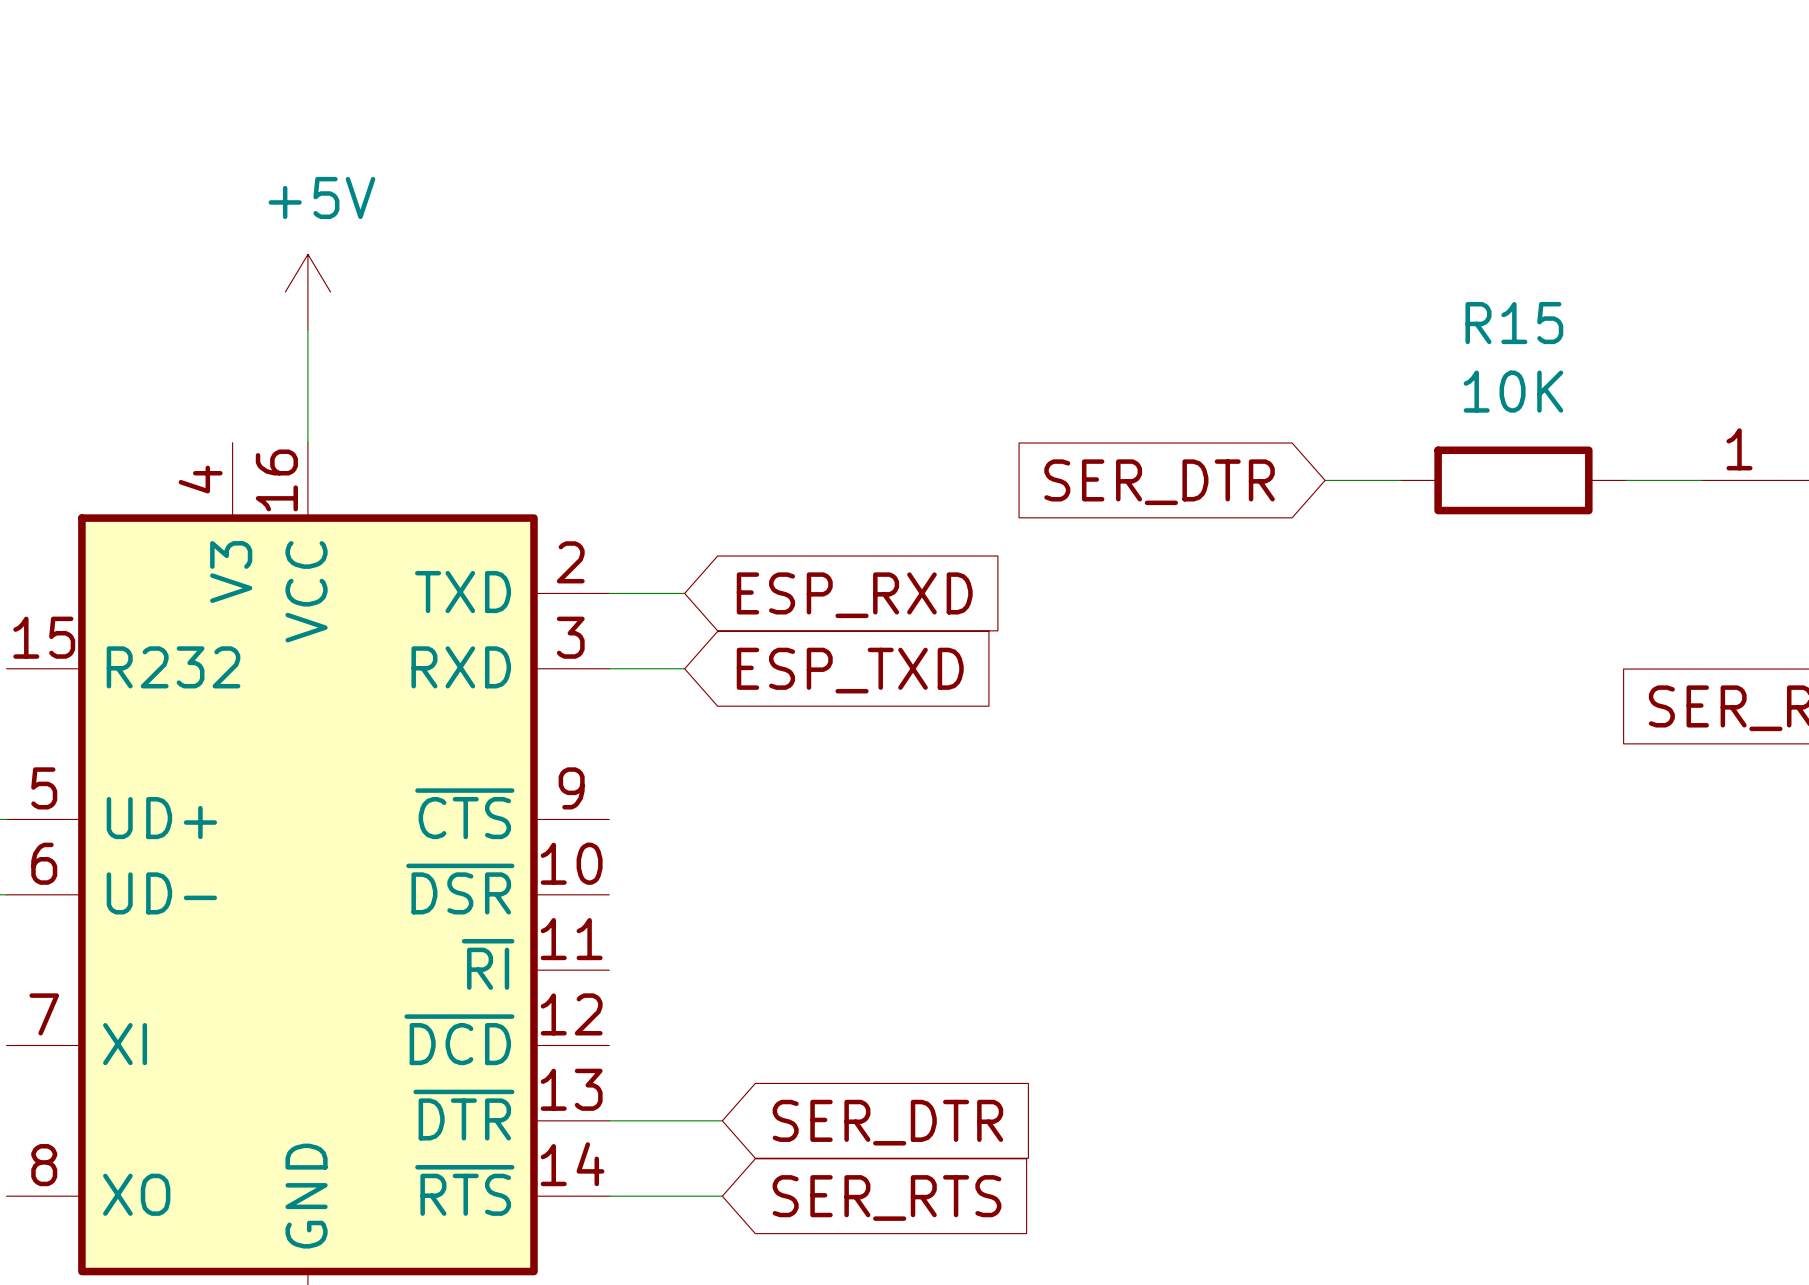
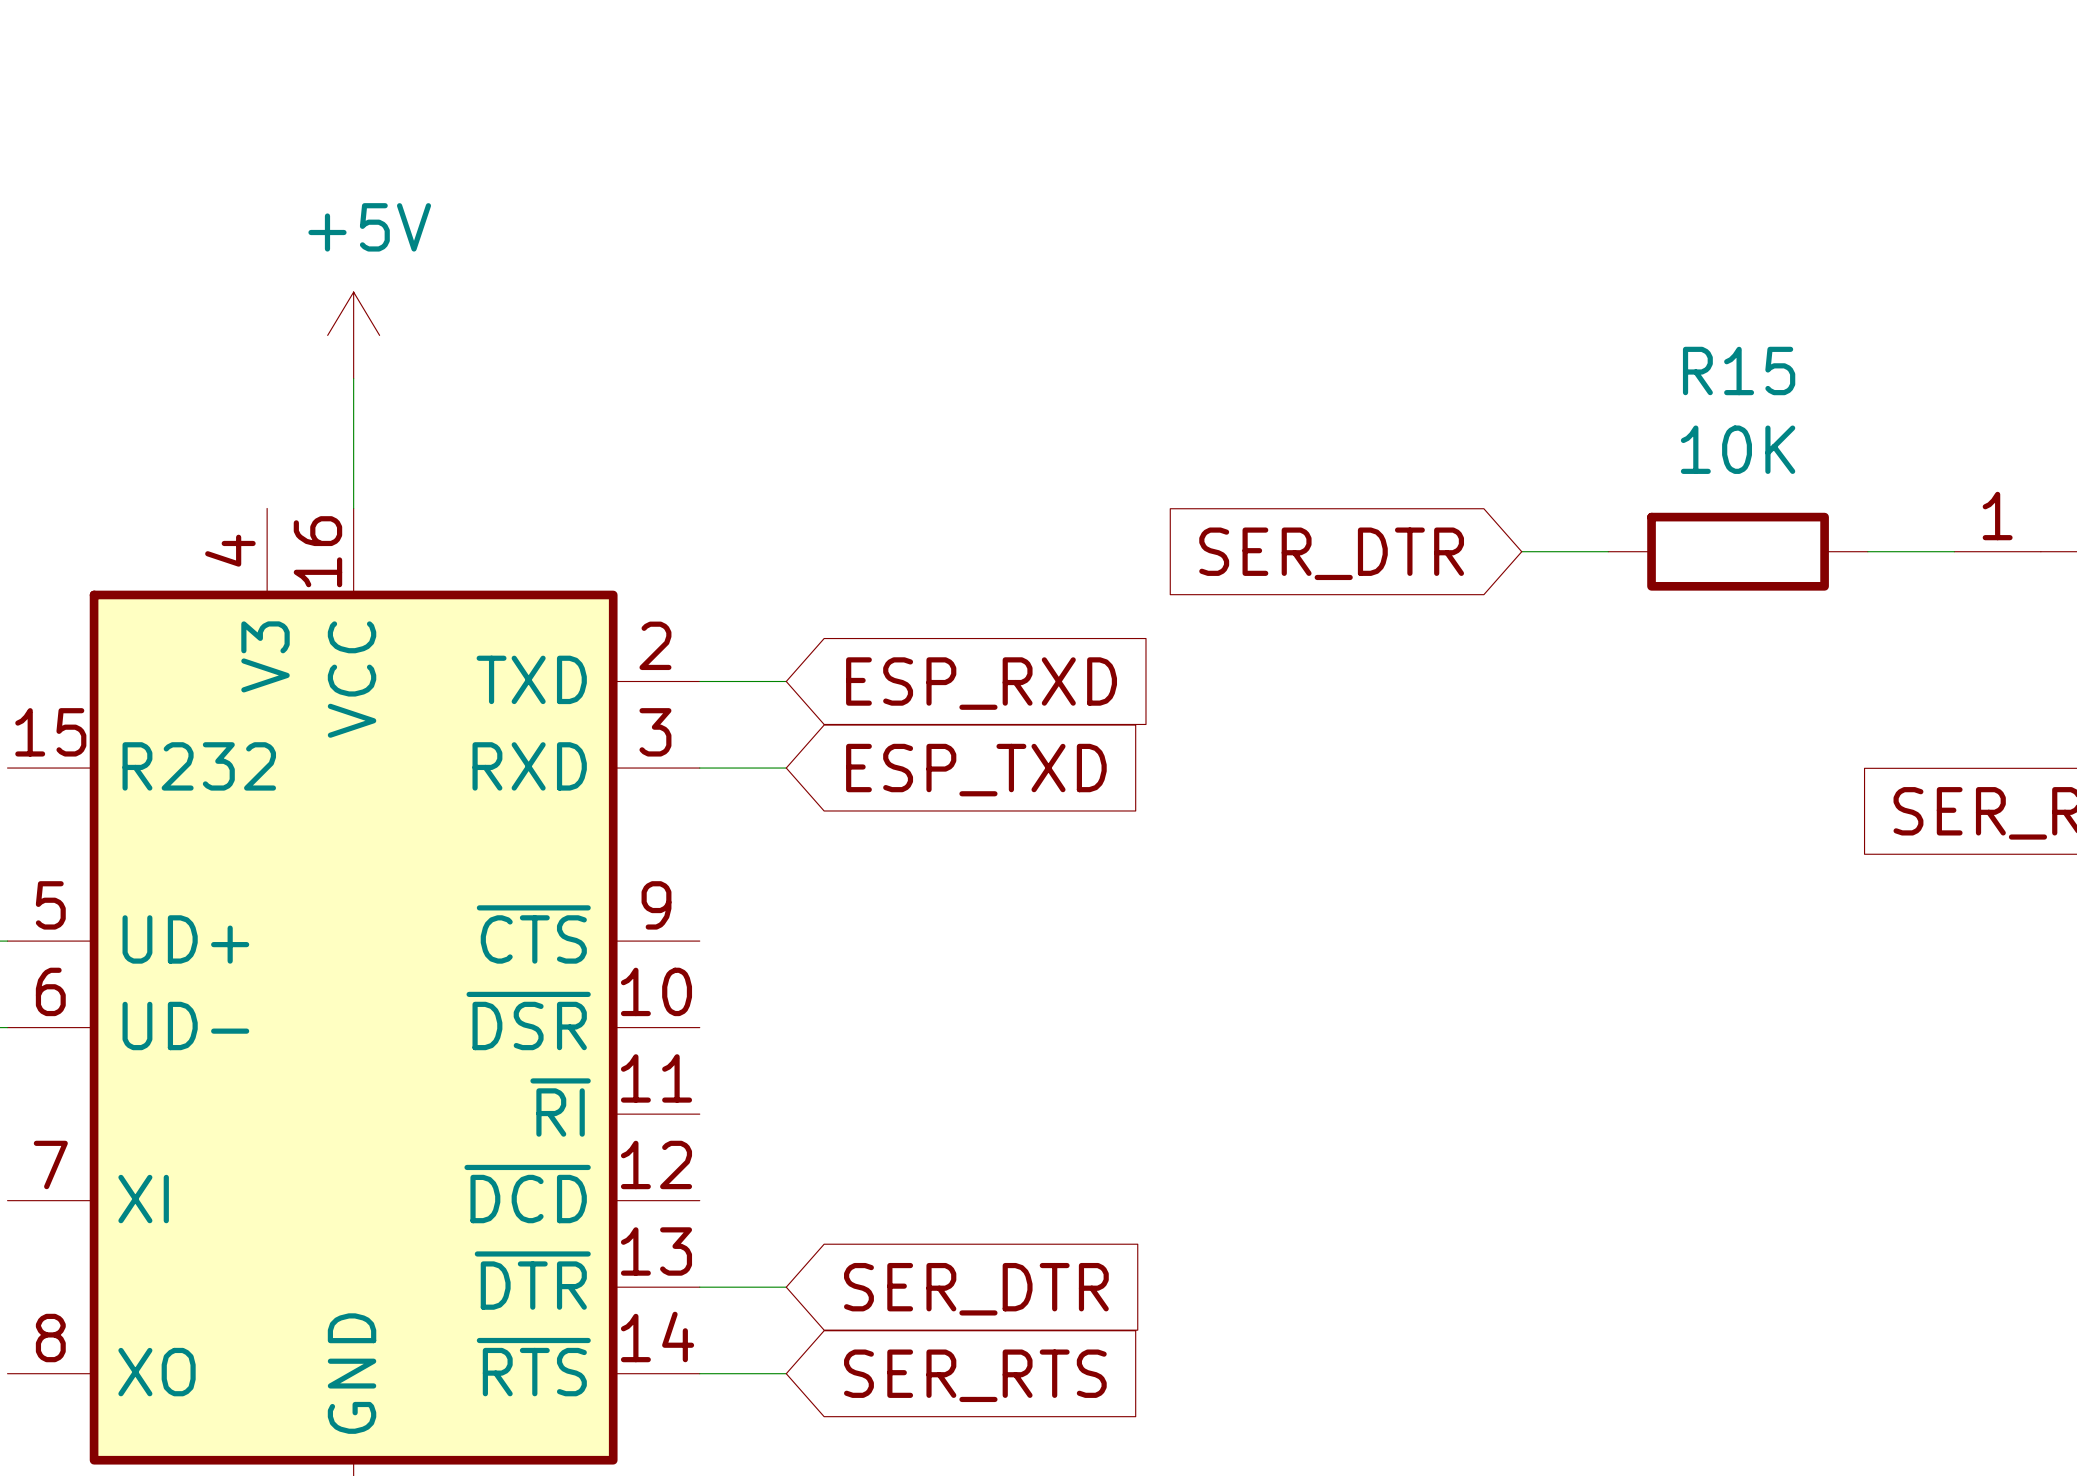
wire: (684, 1120) (722, 1120) -> none
global label position: SER_DTR (887, 1122) -> SER_DTR (976, 1289)
wire: (684, 1196) (722, 1196) -> none
global label position: SER_RTS (886, 1197) -> SER_RTS (975, 1375)

